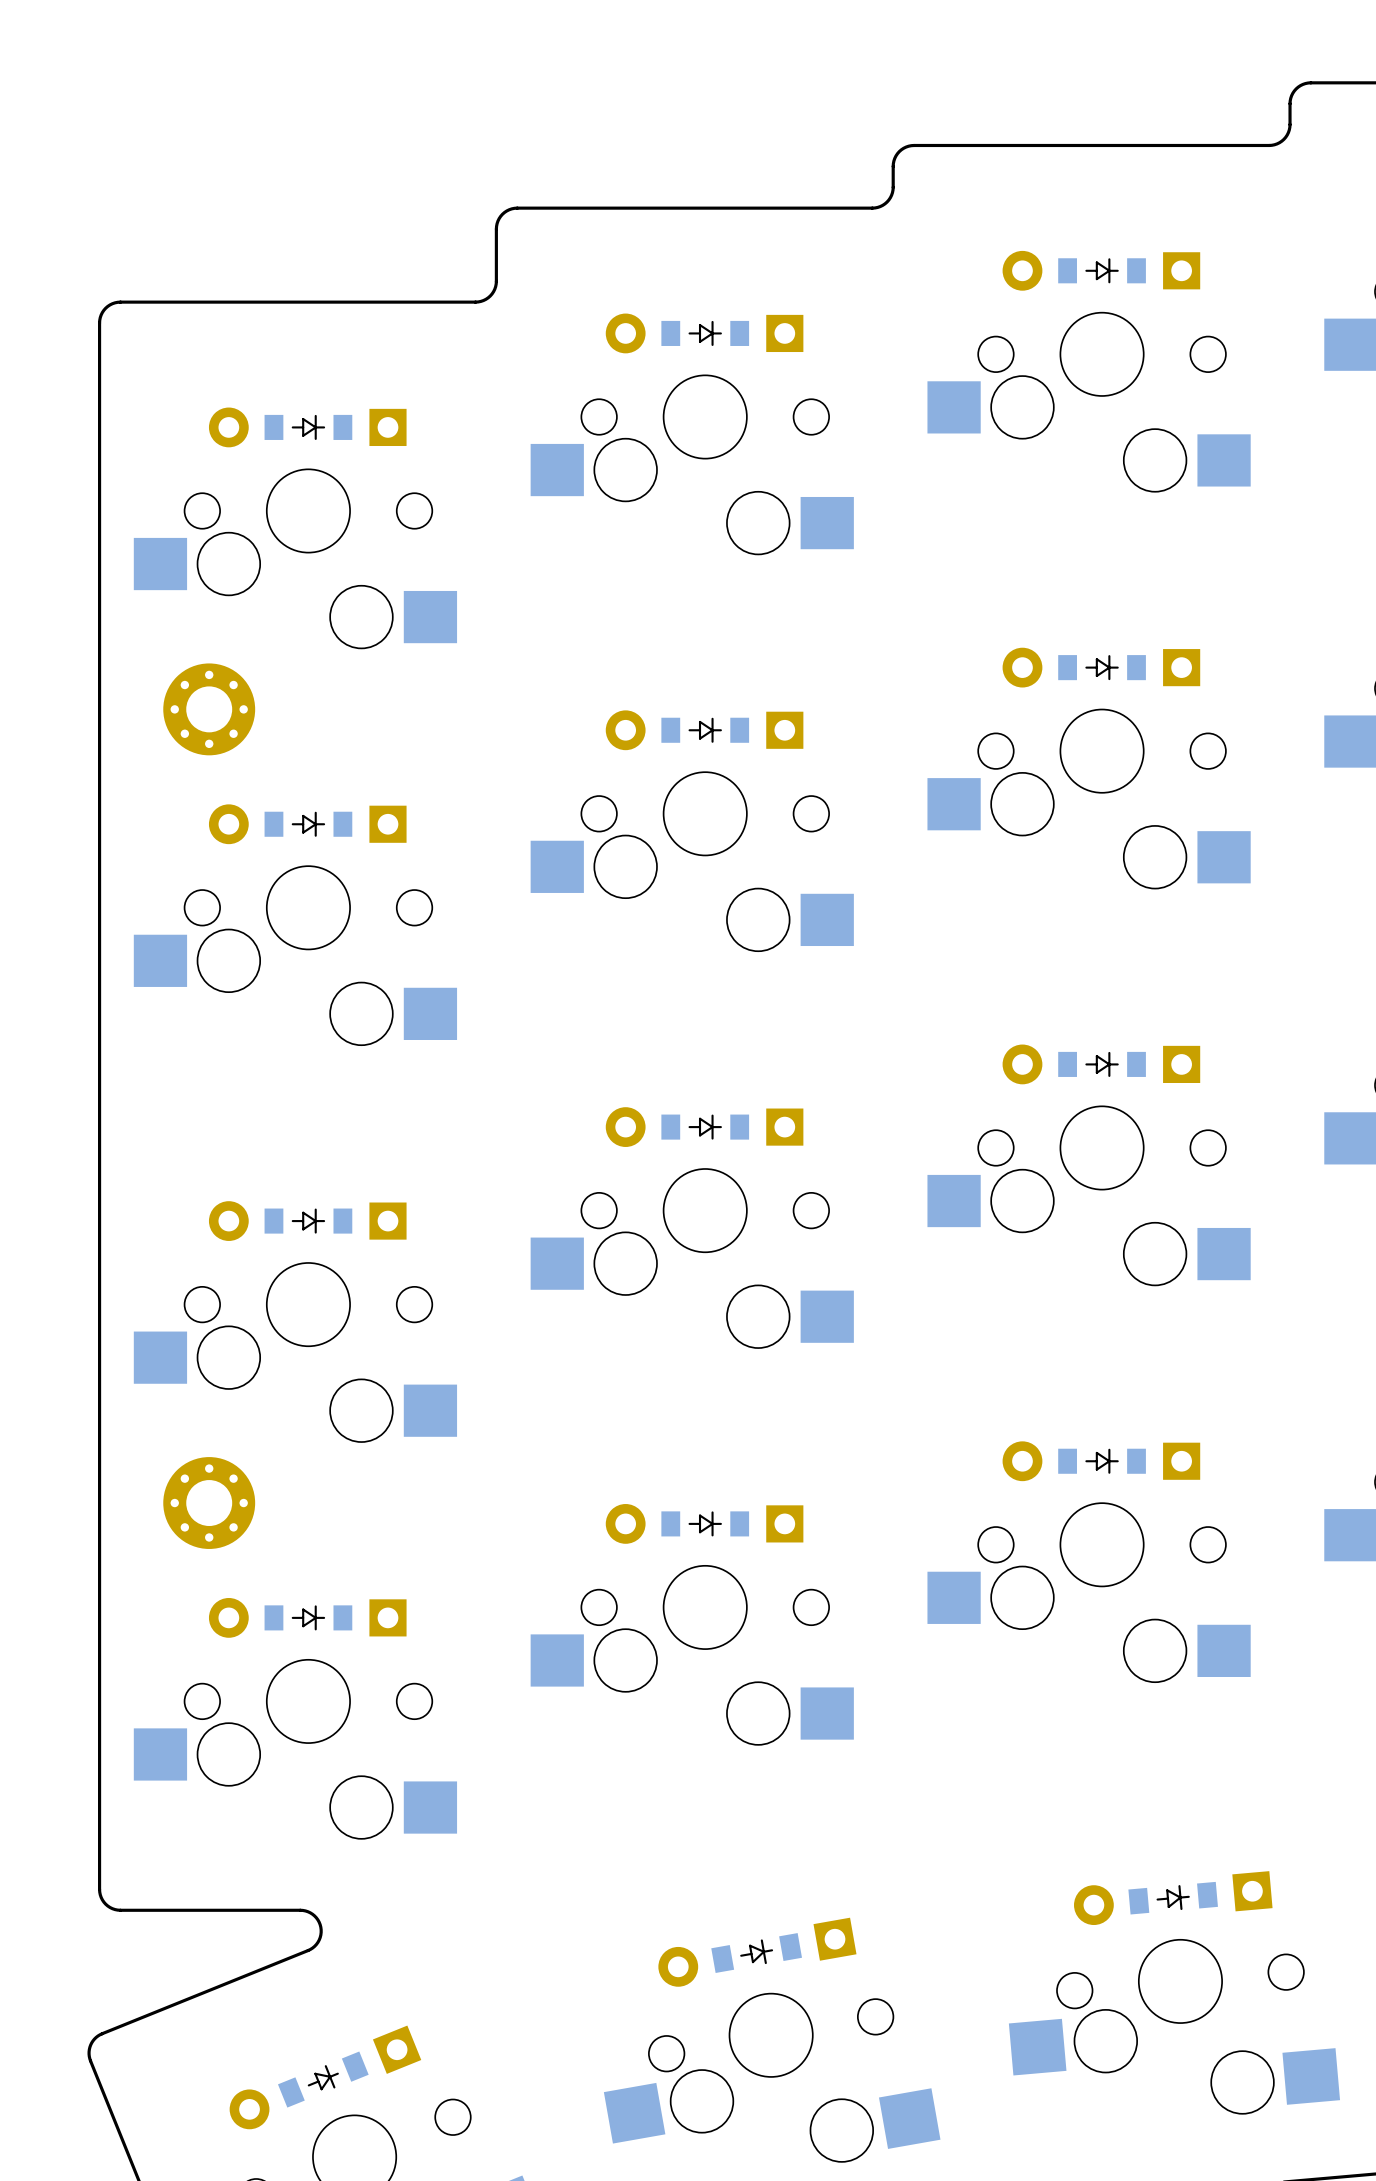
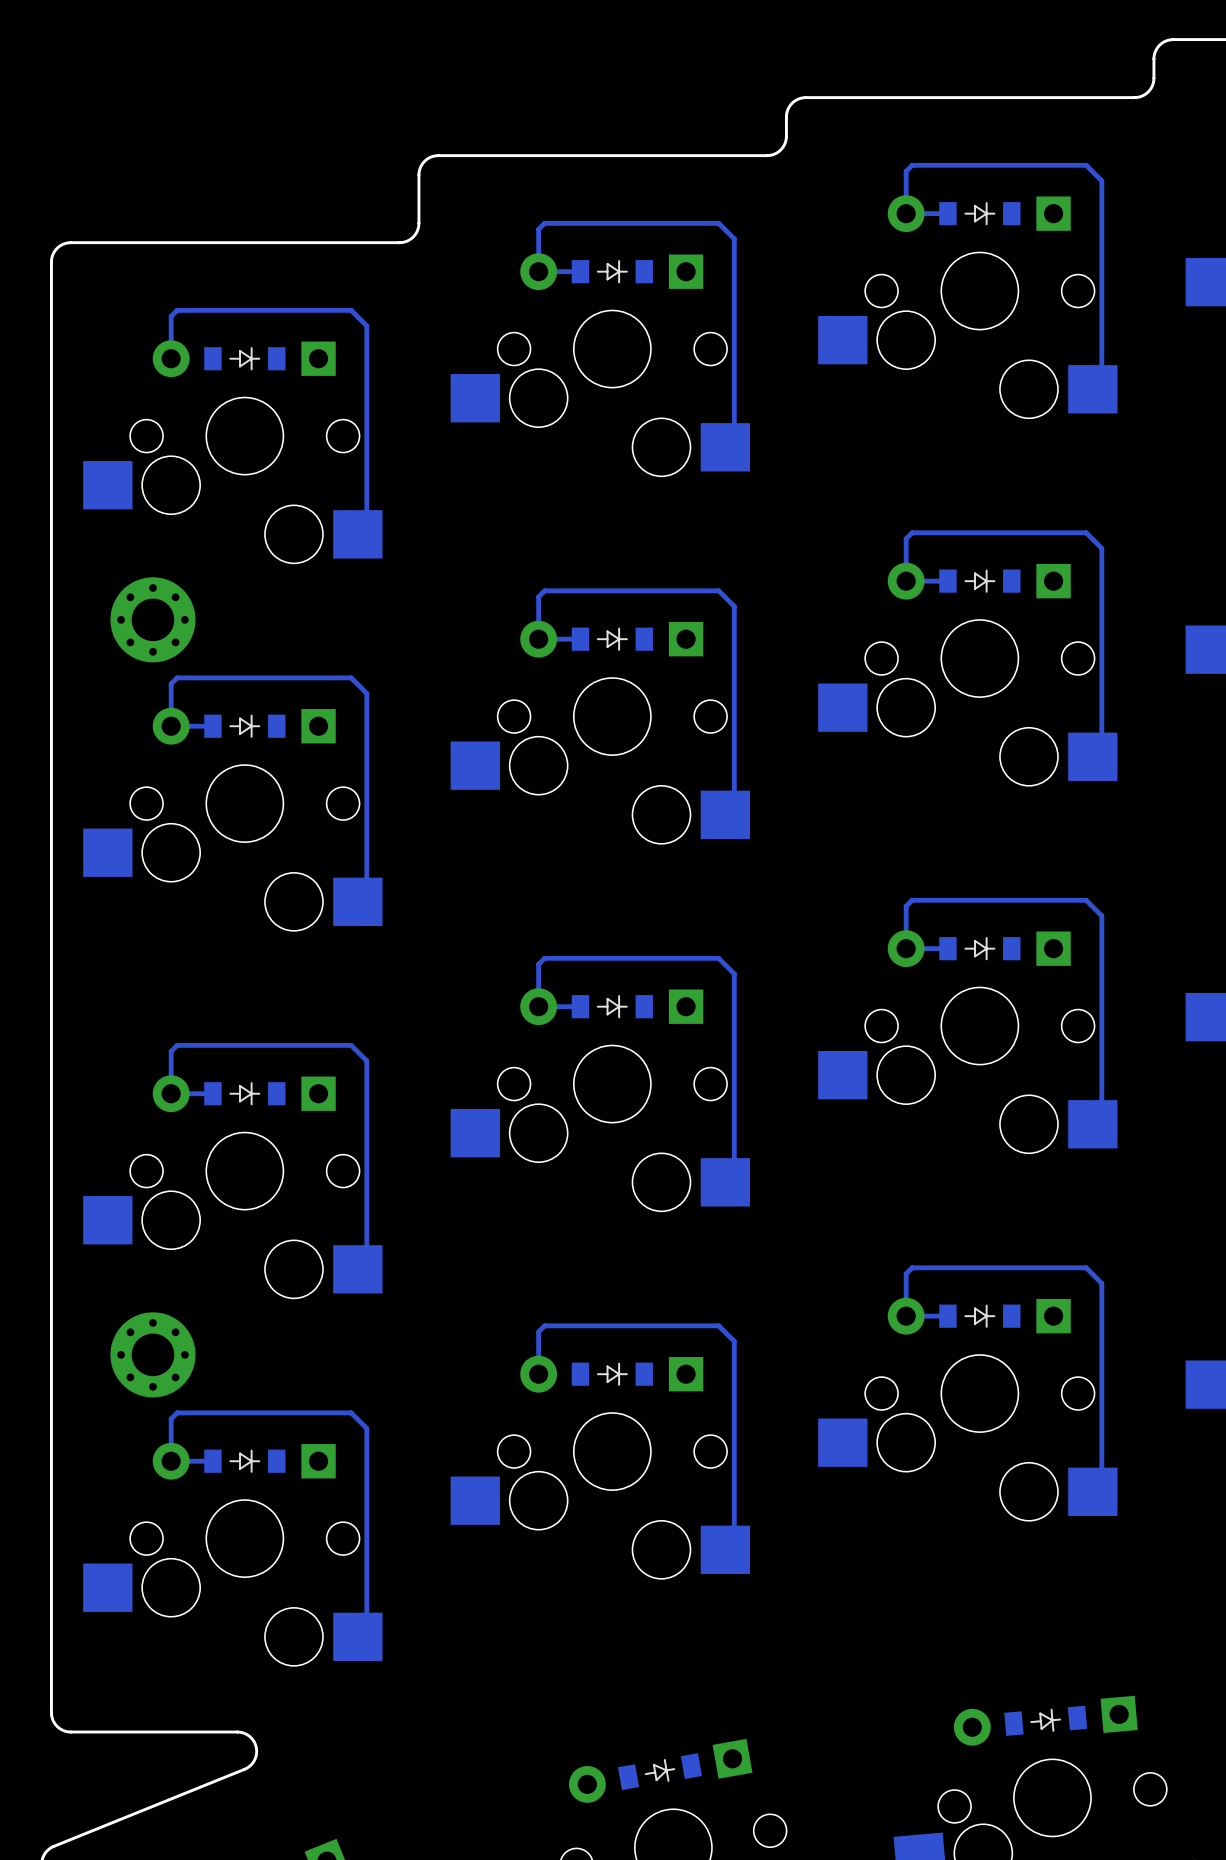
track: none -> (947, 213) (906, 213) (906, 171) (912, 165) (1086, 165) (1101, 180) (1101, 380) (1092, 389)
track: none -> (580, 271) (538, 271) (538, 229) (544, 223) (718, 223) (734, 238) (734, 438) (725, 447)
track: none -> (171, 358) (171, 316) (177, 310) (351, 310) (366, 325) (366, 525) (357, 534)
track: none -> (947, 581) (906, 581) (906, 538) (912, 532) (1086, 532) (1101, 548) (1101, 747) (1092, 756)
track: none -> (580, 639) (538, 639) (538, 596) (544, 590) (718, 590) (734, 606) (734, 805) (725, 814)
track: none -> (212, 726) (171, 726) (171, 683) (177, 677) (351, 677) (366, 693) (366, 892) (357, 901)
track: none -> (947, 948) (906, 948) (906, 906) (912, 900) (1086, 900) (1101, 915) (1101, 1115) (1092, 1124)
track: none -> (580, 1006) (538, 1006) (538, 964) (544, 958) (718, 958) (734, 973) (734, 1173) (725, 1182)
track: none -> (212, 1093) (171, 1093) (171, 1051) (177, 1045) (351, 1045) (366, 1060) (366, 1260) (357, 1269)
track: none -> (947, 1316) (906, 1316) (906, 1273) (912, 1267) (1086, 1267) (1101, 1283) (1101, 1482) (1092, 1491)
track: none -> (538, 1374) (538, 1331) (544, 1325) (718, 1325) (734, 1341) (734, 1540) (725, 1549)
track: none -> (212, 1461) (171, 1461) (171, 1418) (177, 1412) (351, 1412) (366, 1428) (366, 1627) (357, 1636)

